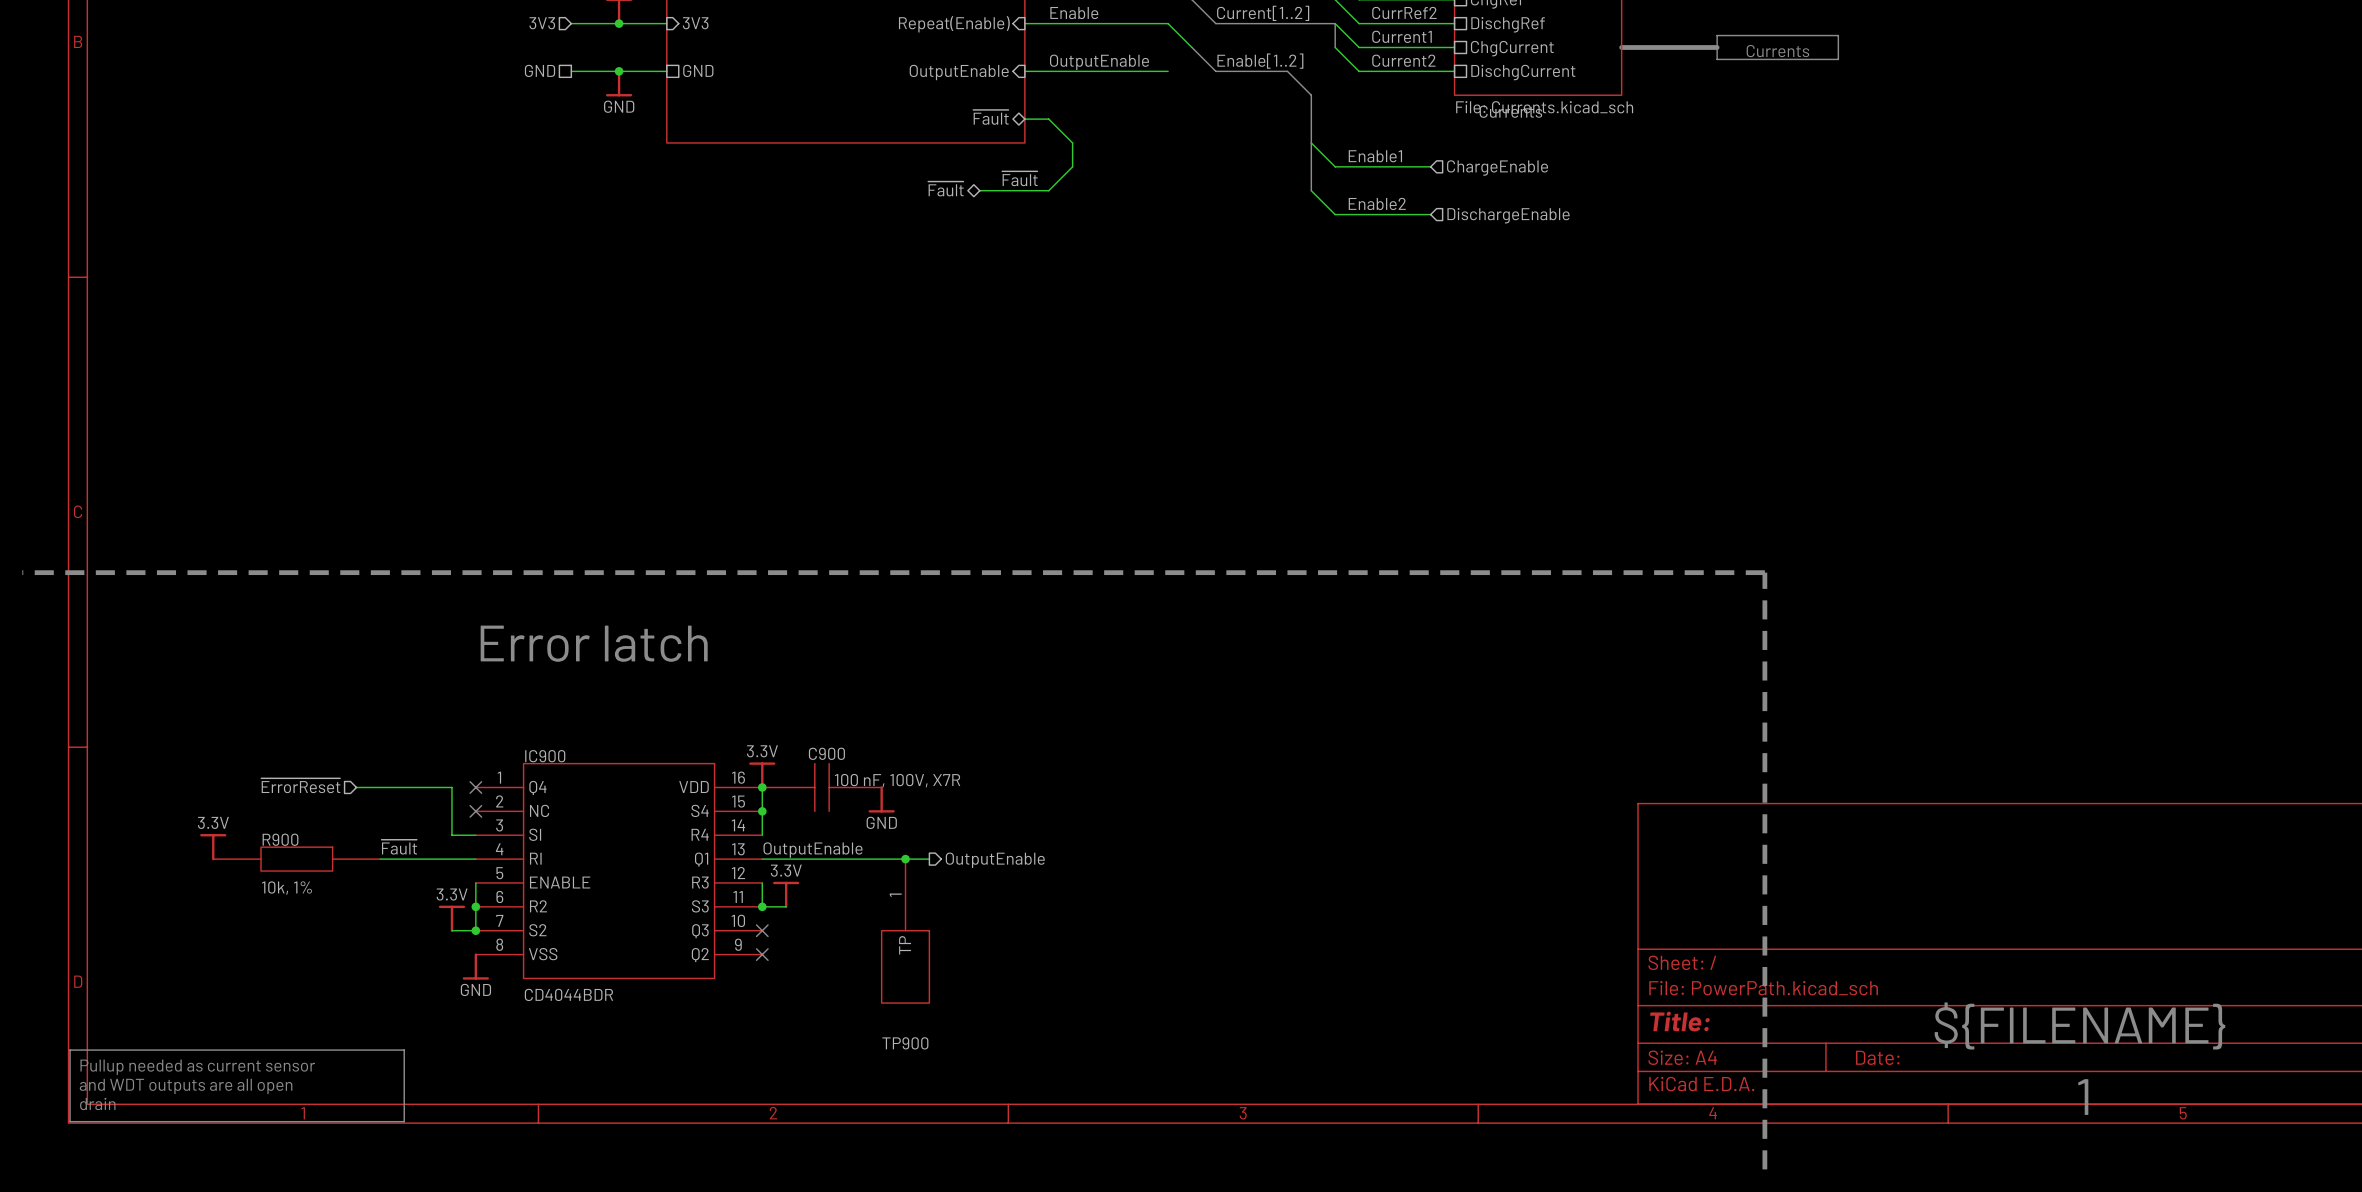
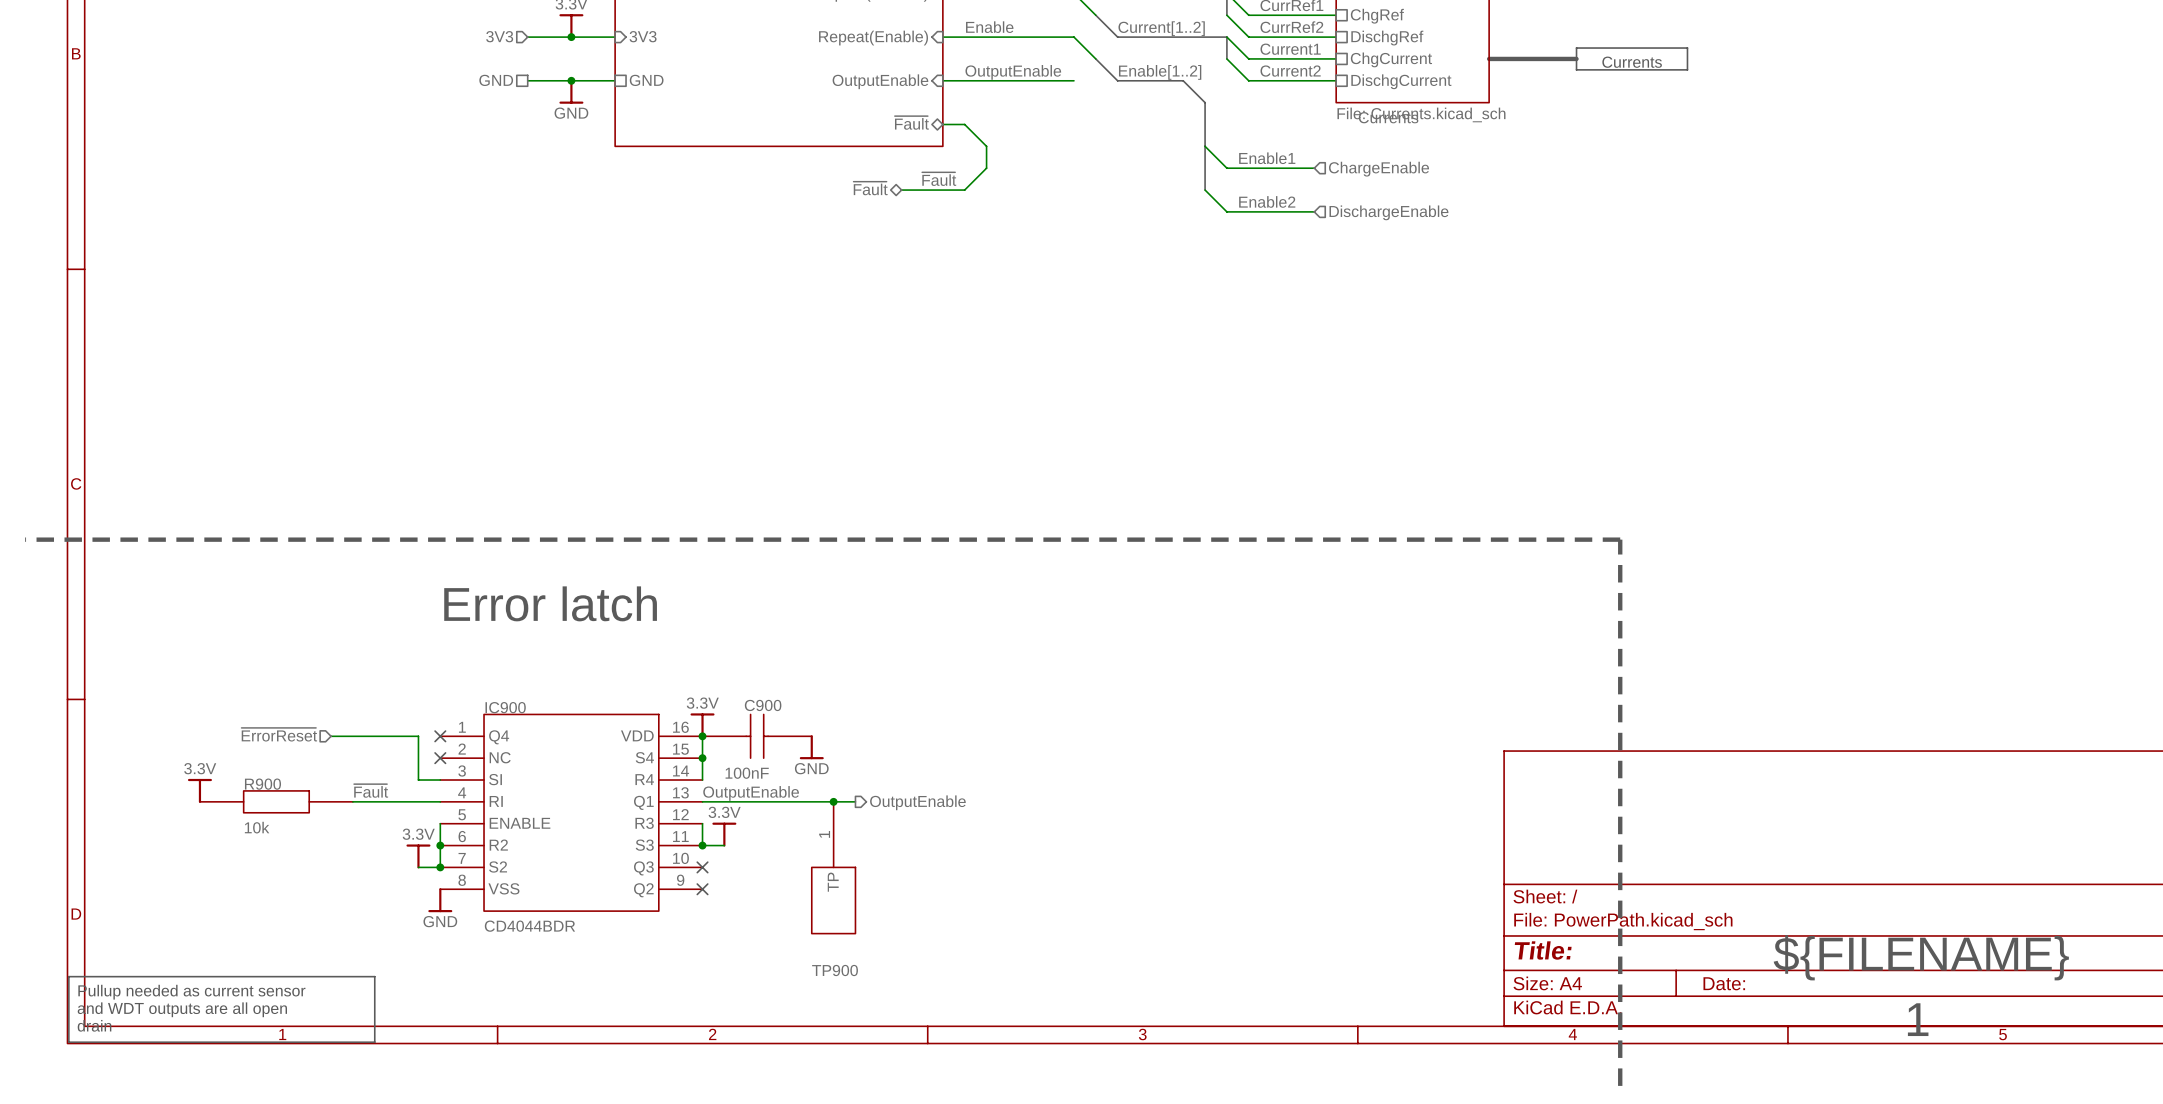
C900 value: 100 nF, 100V, X7R (897, 780) -> none
C900 text: none -> 100nF (747, 773)
R900 text: 10k, 1% (286, 888) -> 10k (257, 827)

